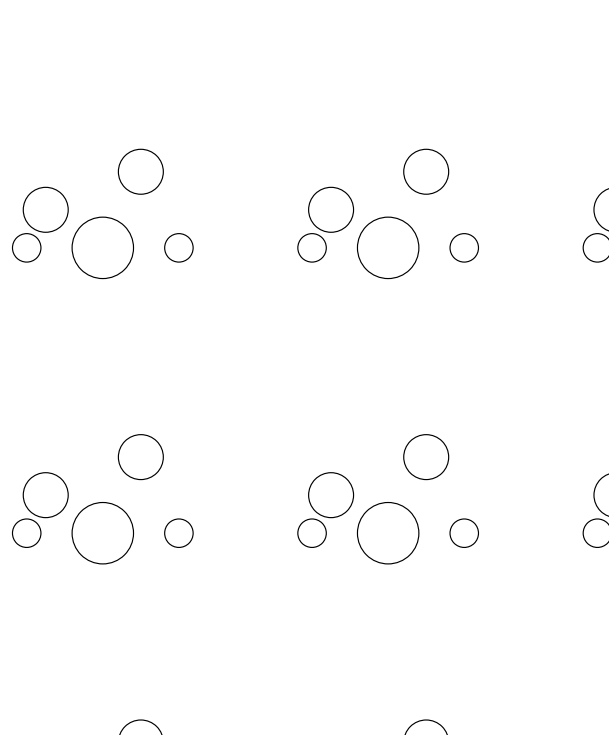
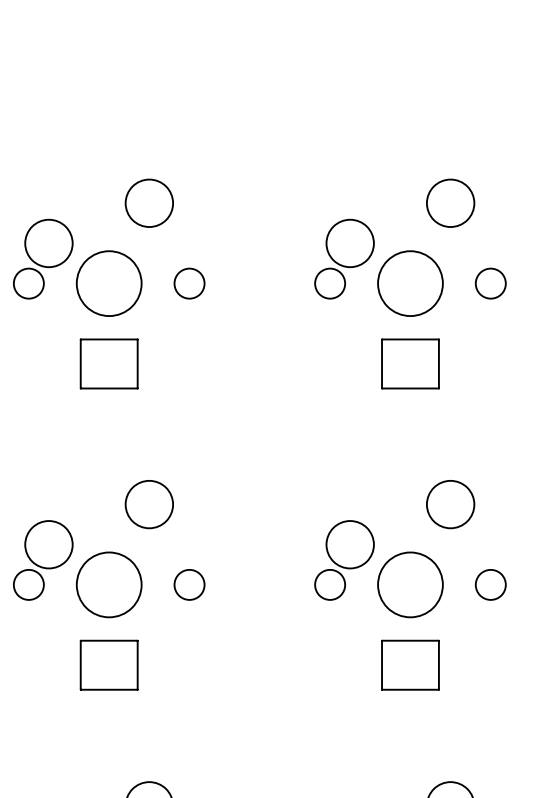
part: none -> (109, 363)
part: none -> (410, 363)
part: none -> (109, 665)
part: none -> (410, 665)

